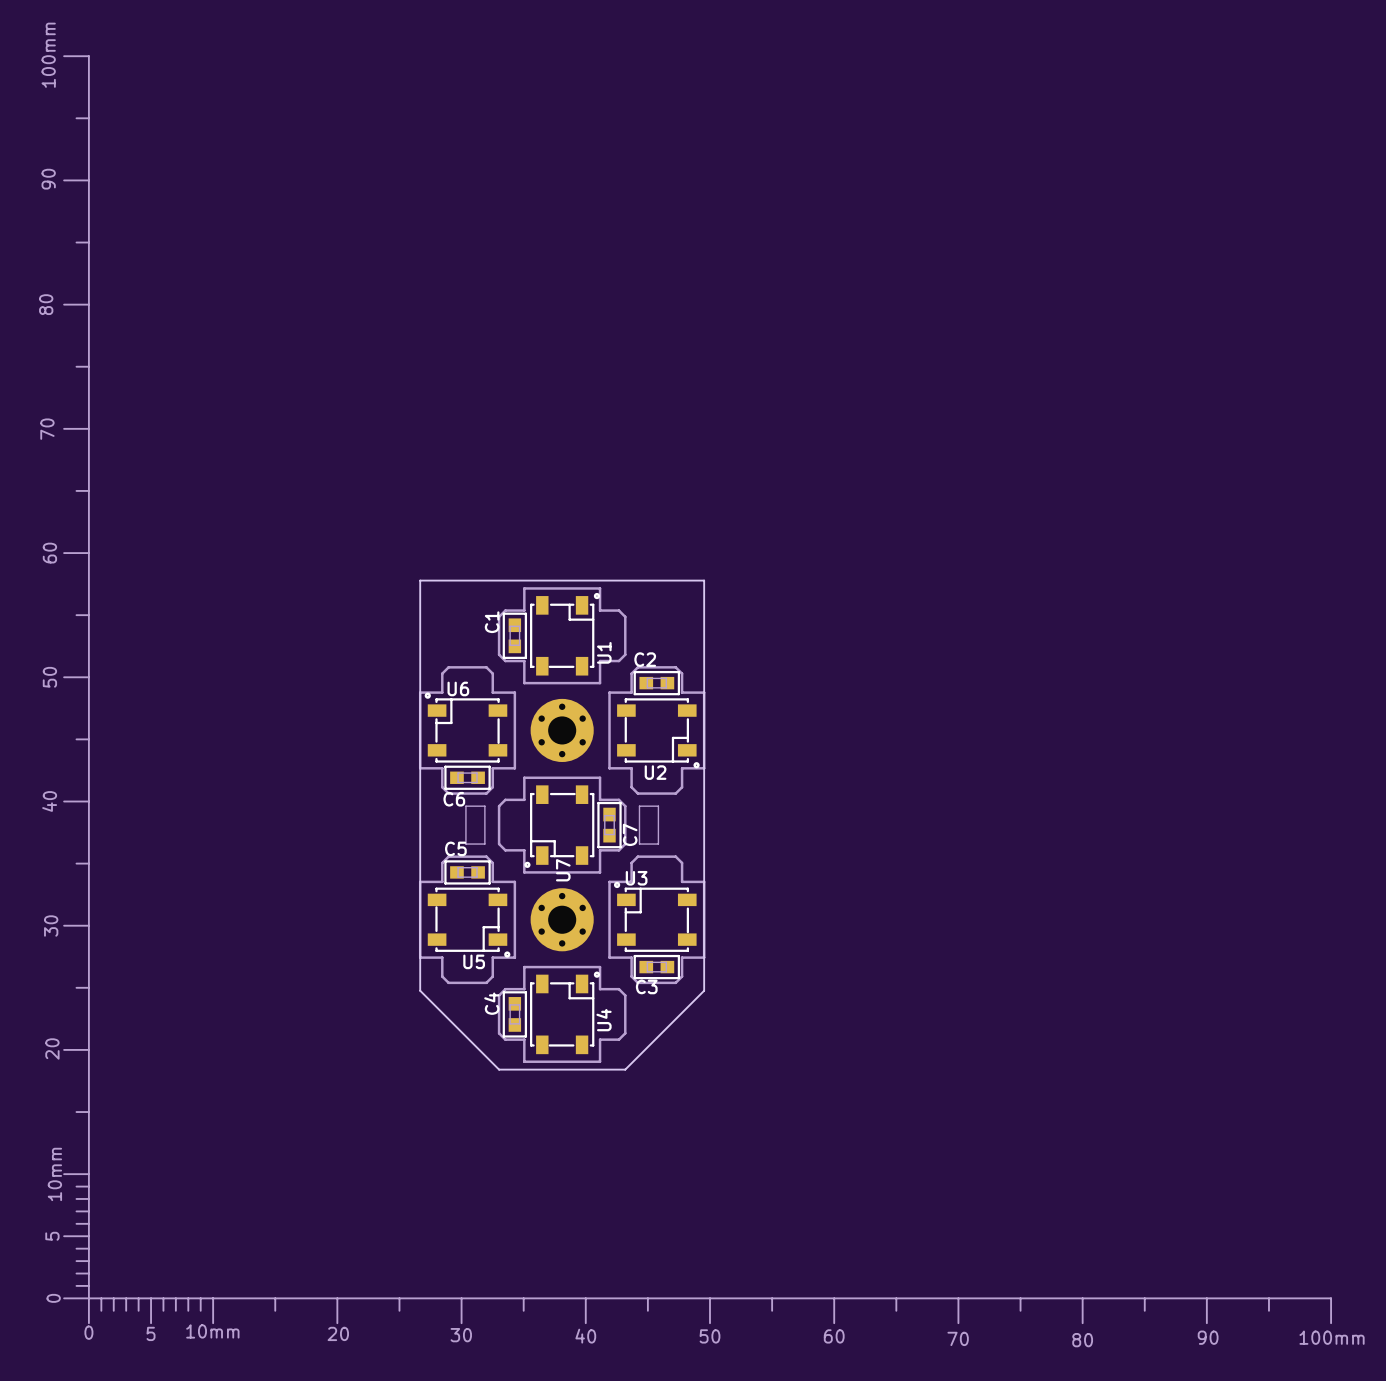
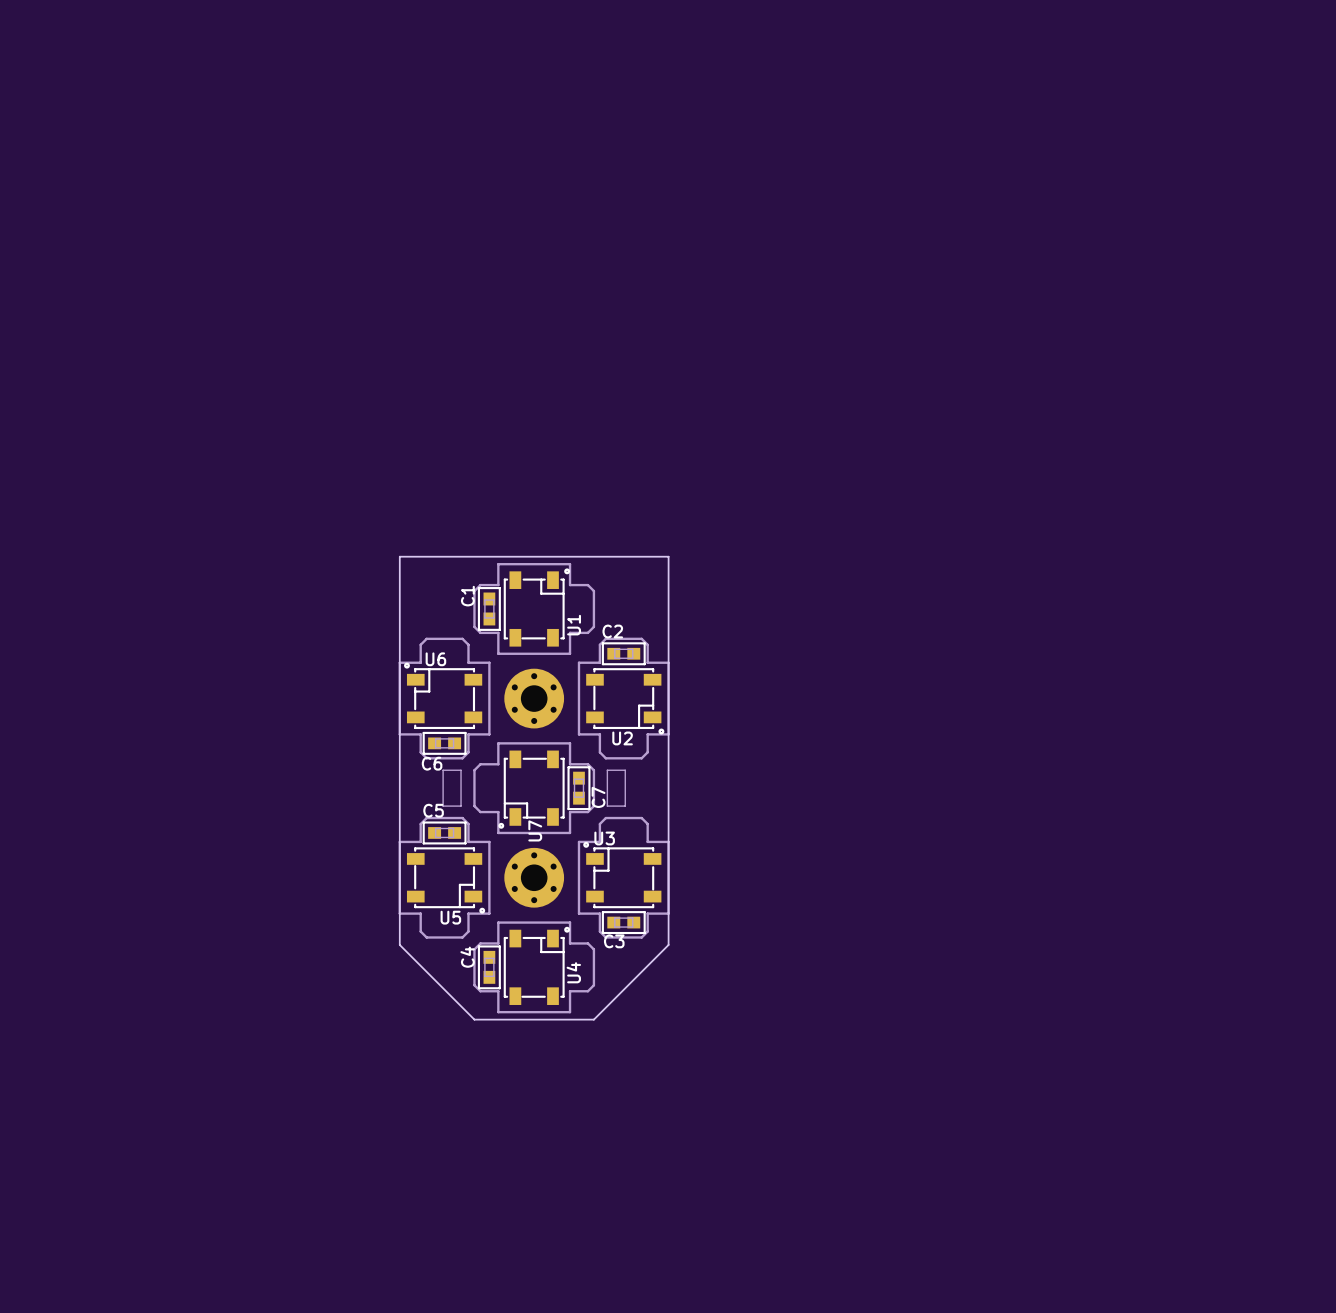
drawing: [63, 55, 1333, 1325] -> none

